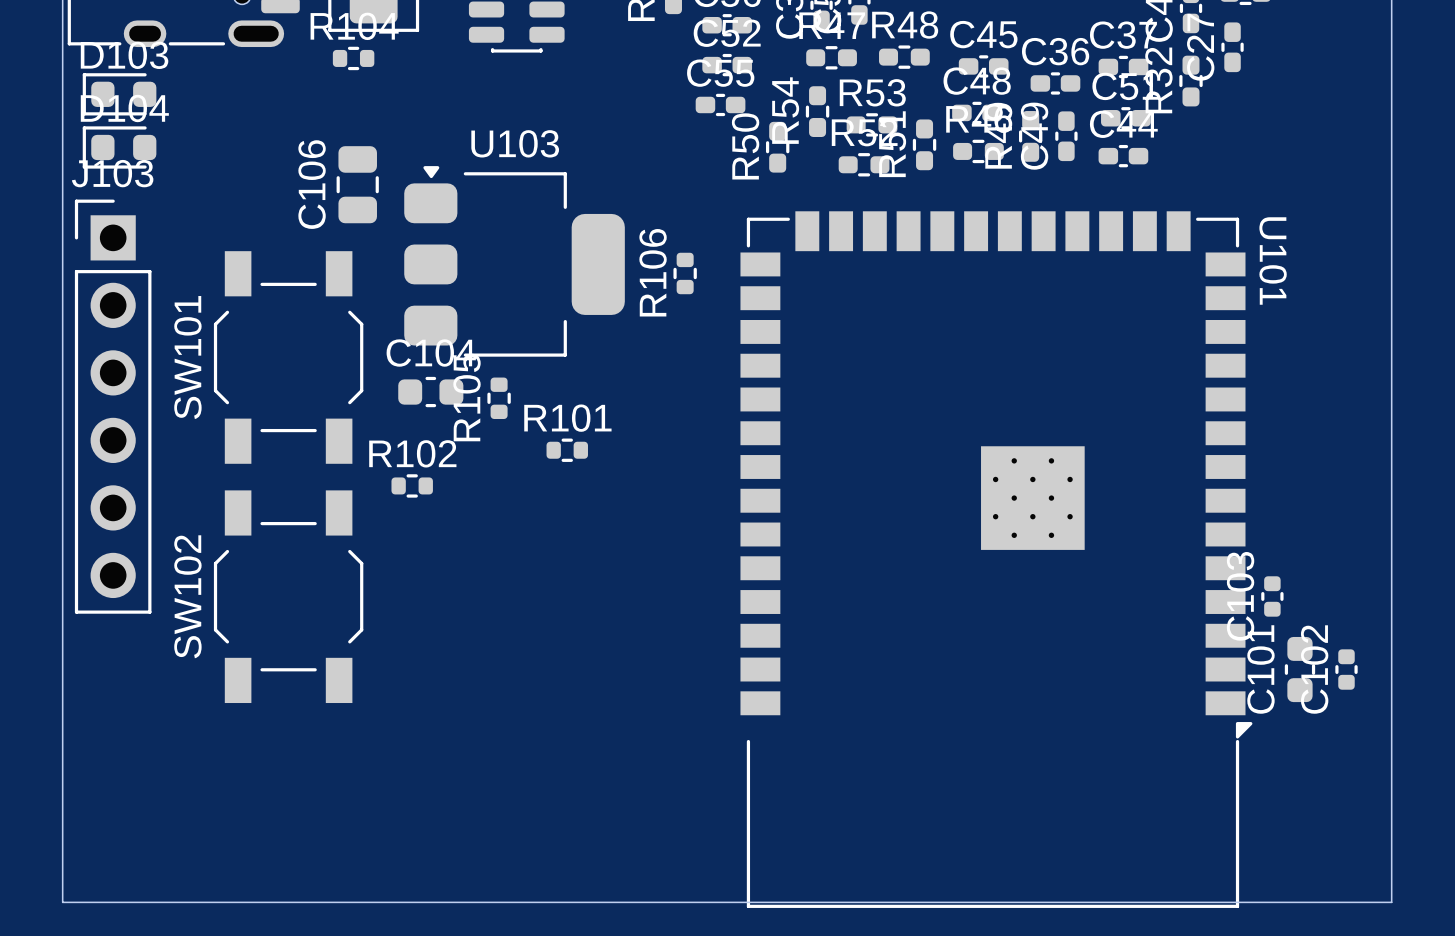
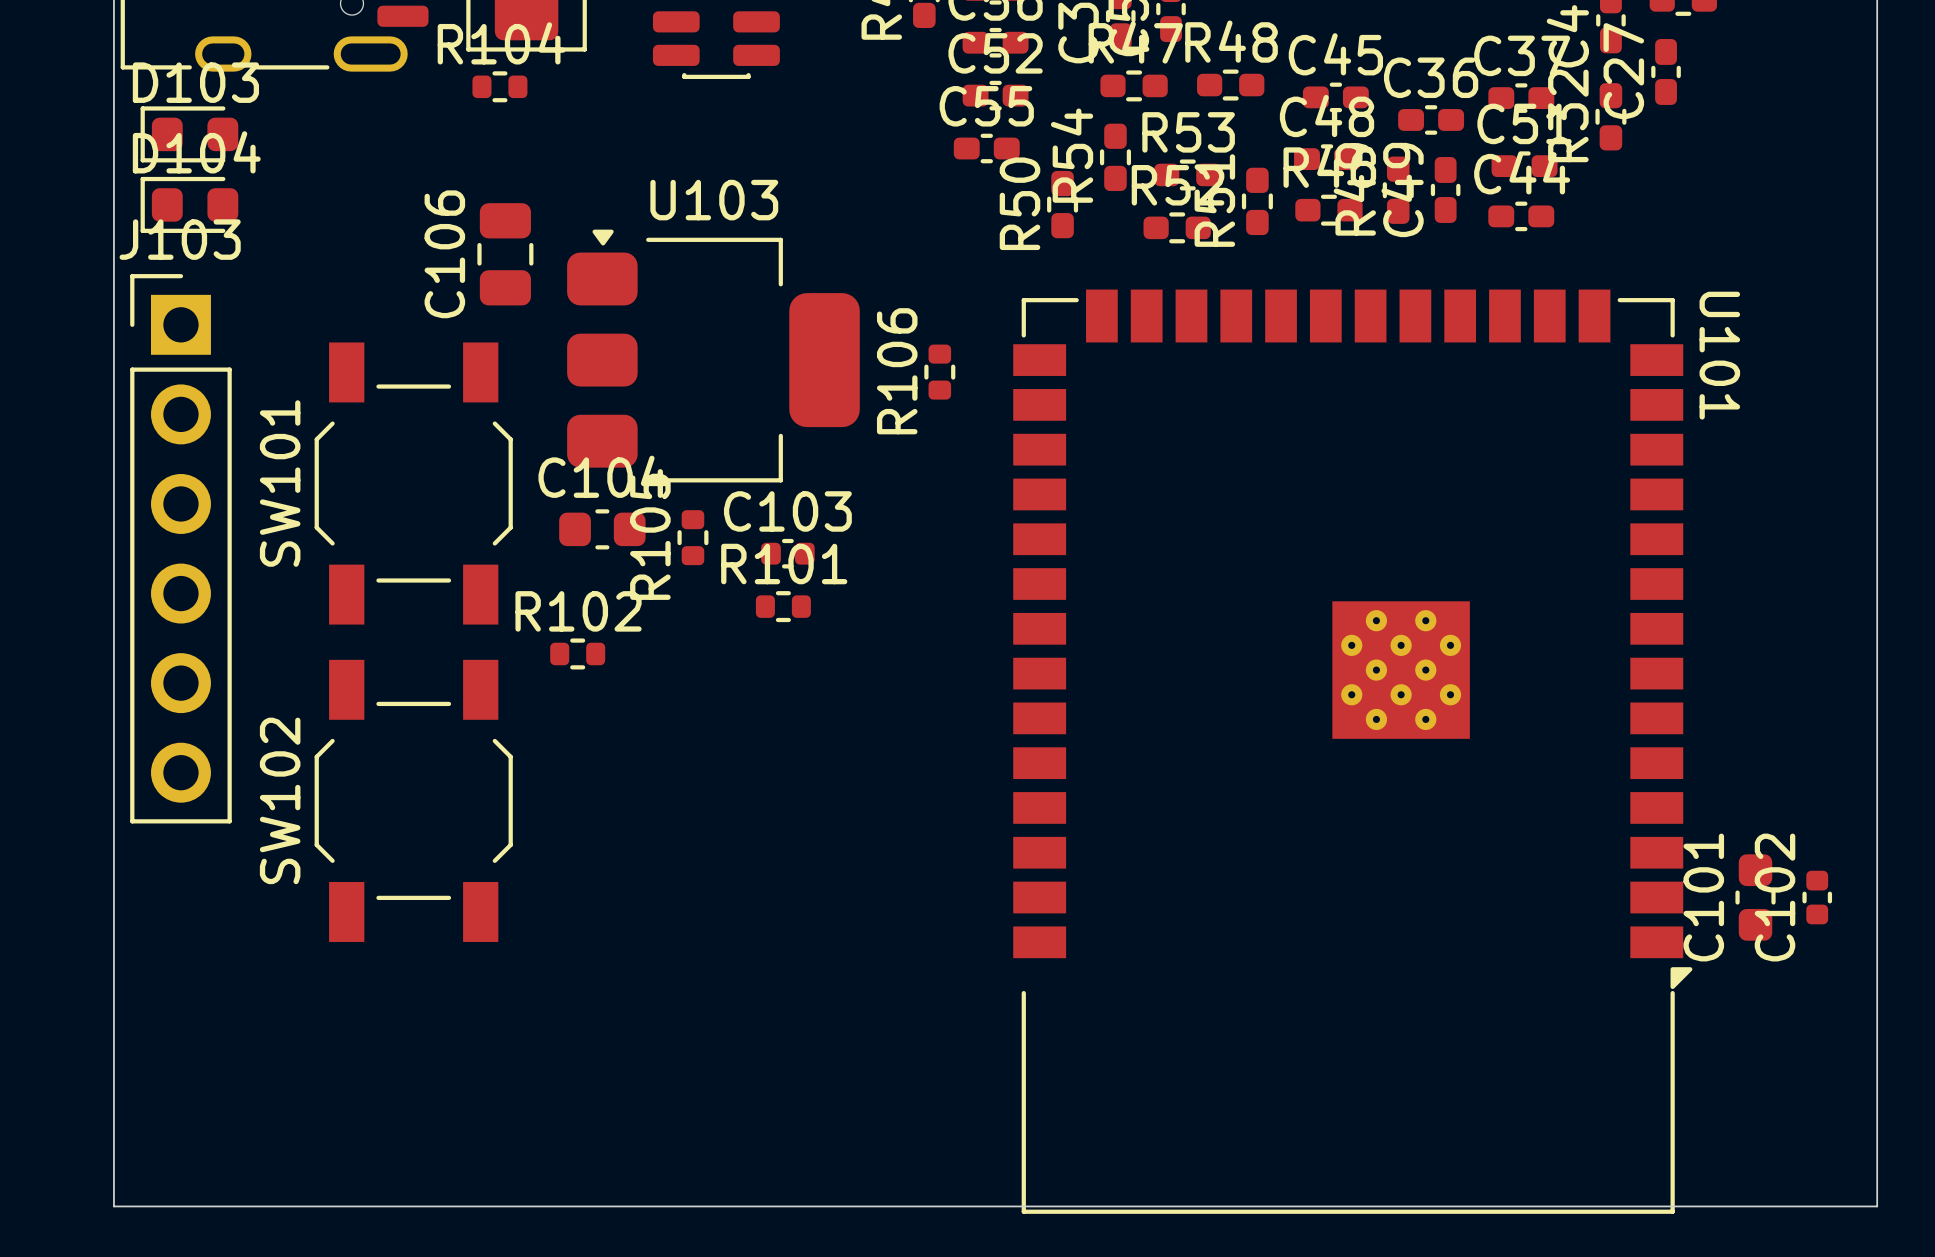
C103 rotation: 0° (1272, 596) -> 90° clockwise (787, 553)
C103 position: (1272, 596) -> (787, 553)

